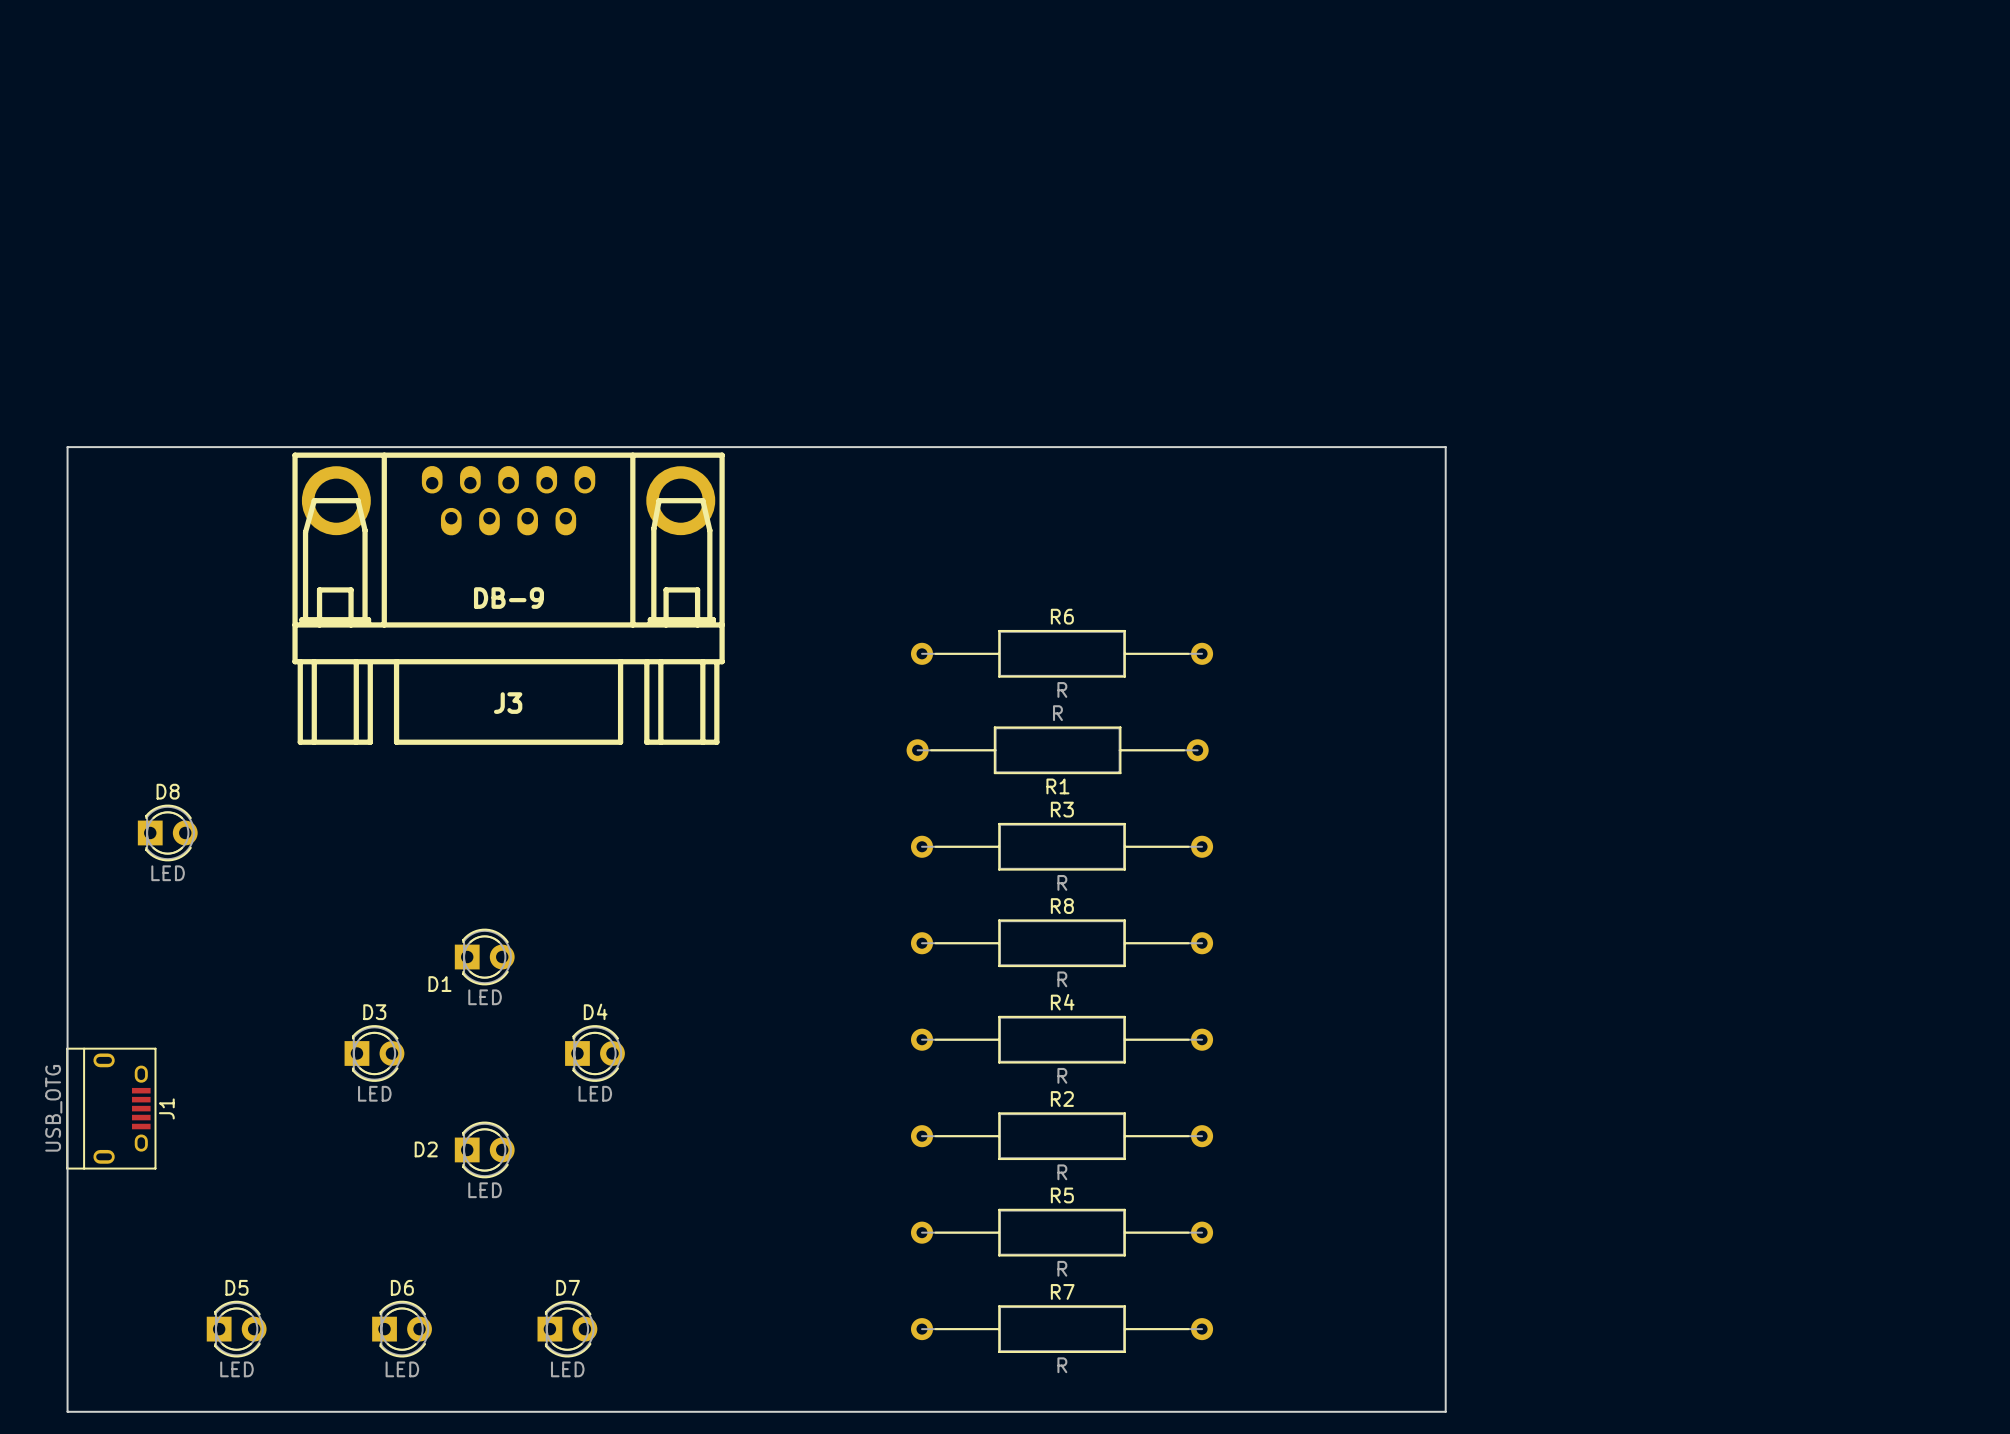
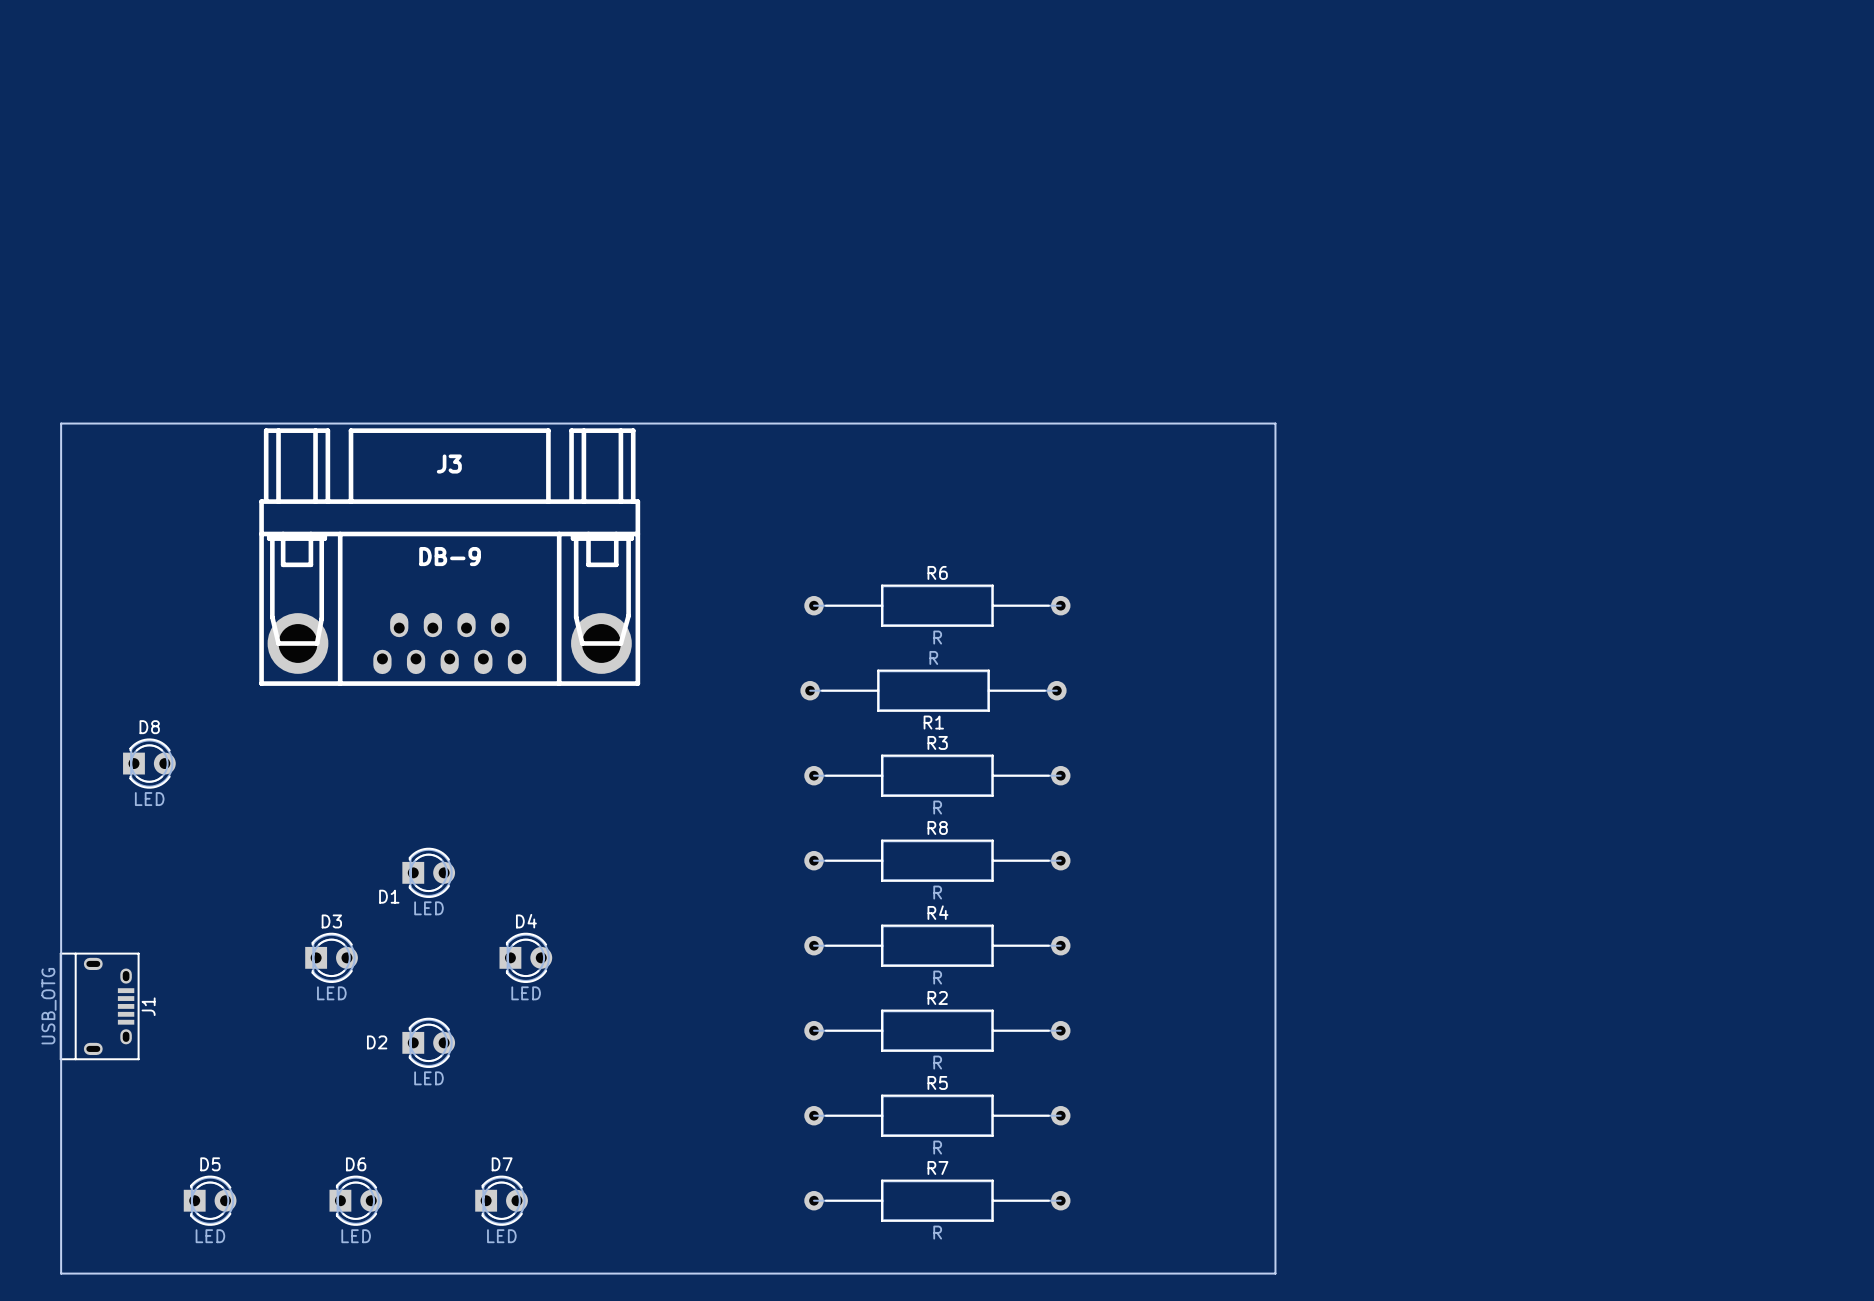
J3 rotation: 0° (508, 598) -> 180° (449, 557)

